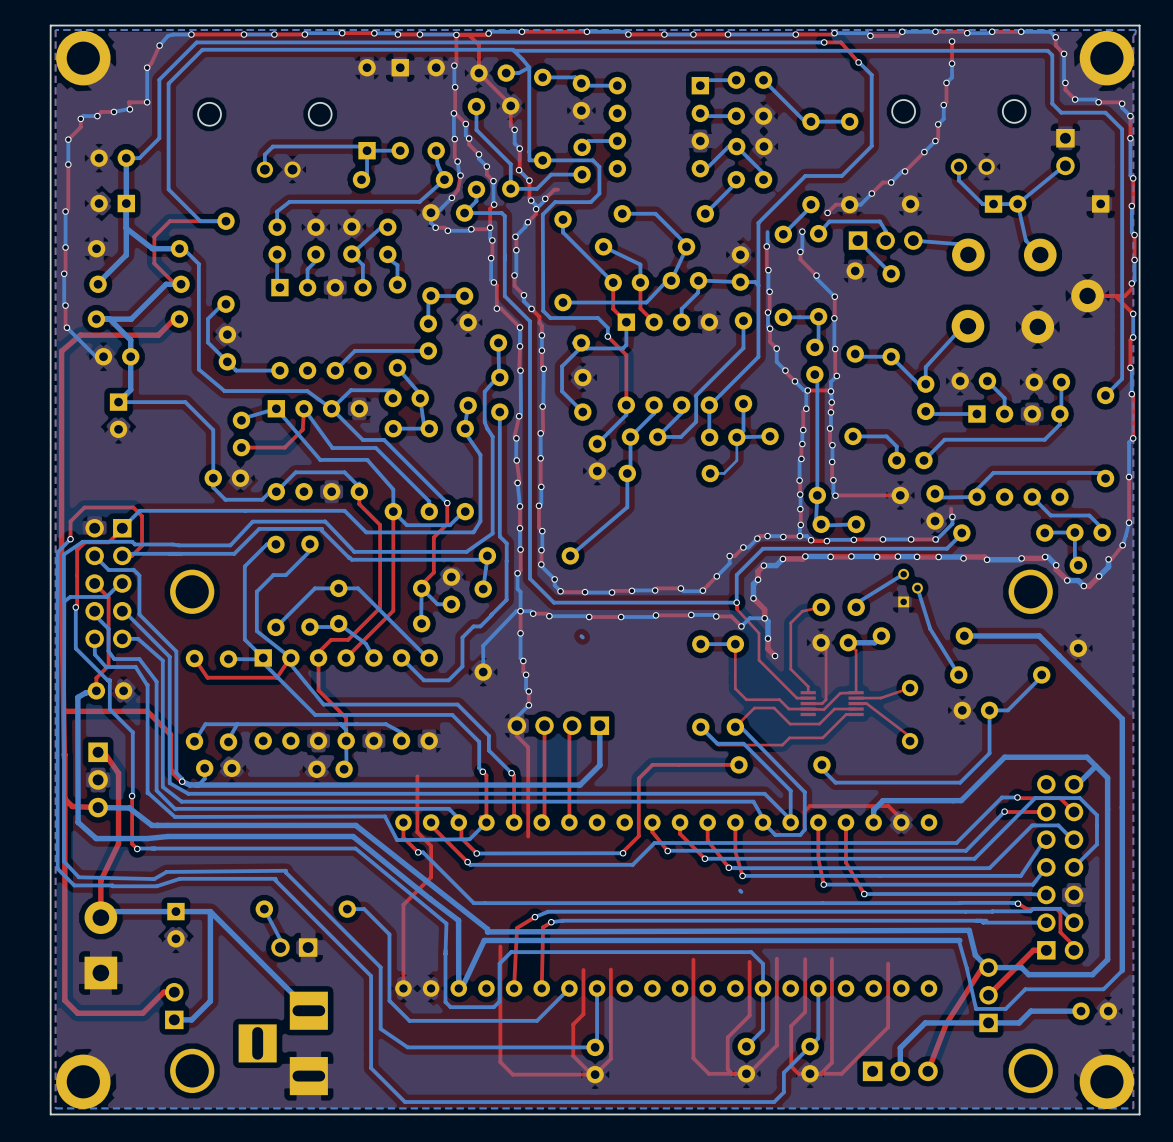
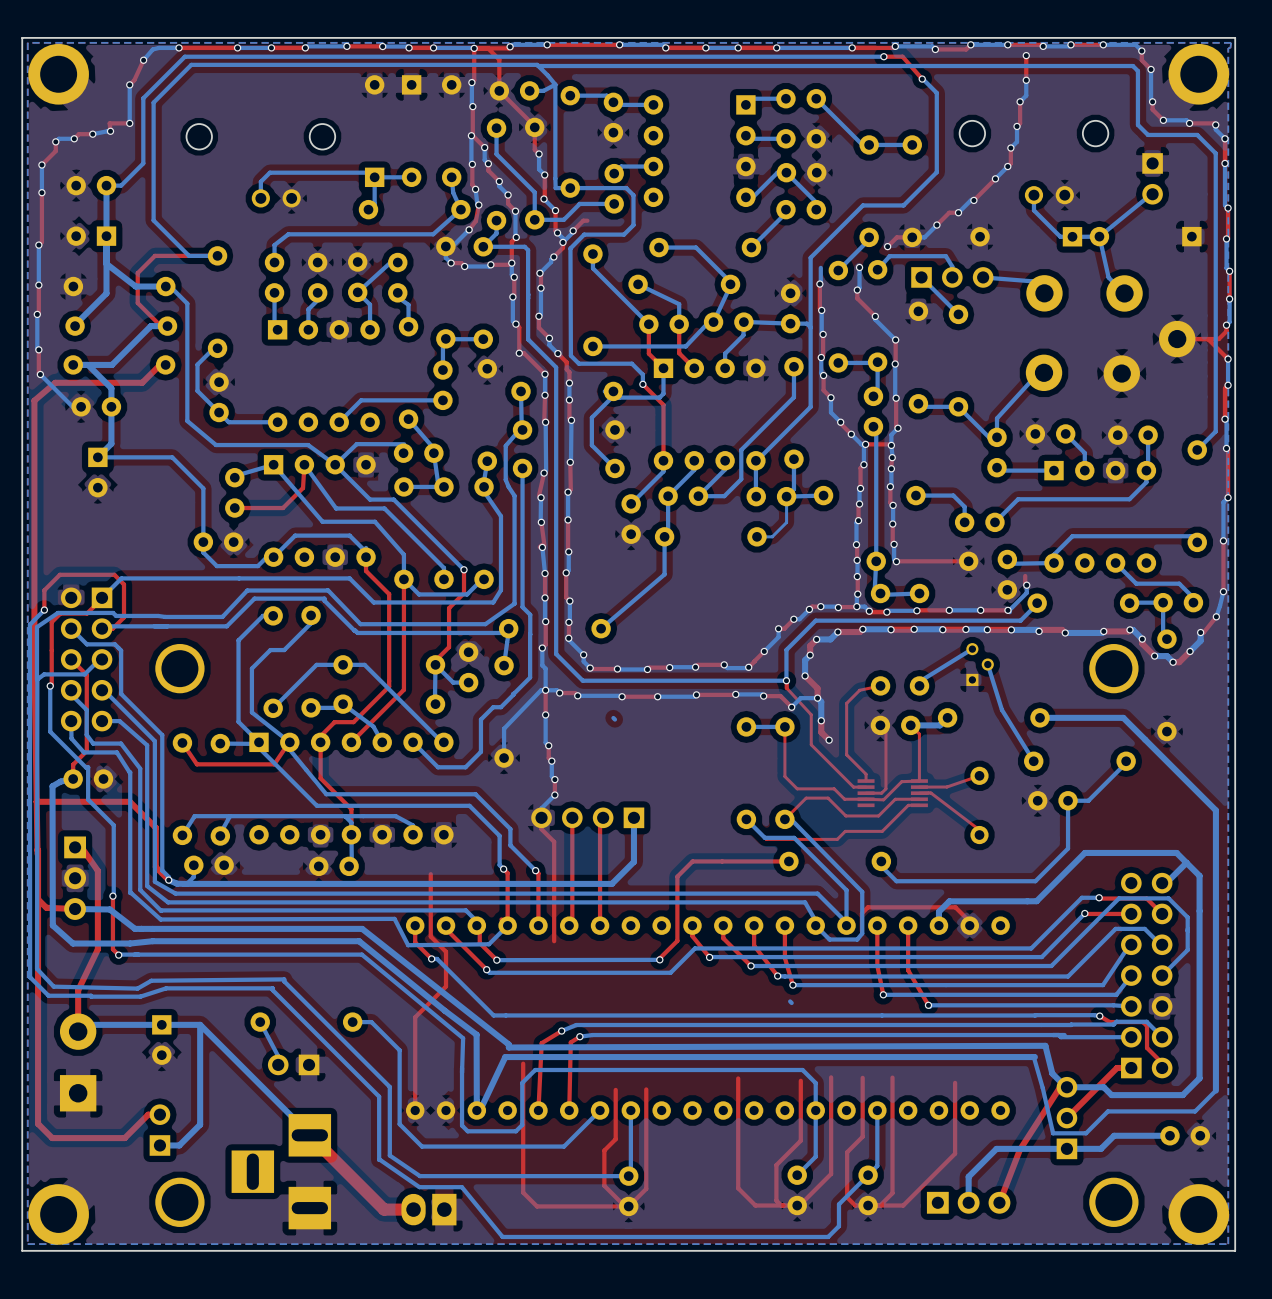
top track: none -> (309, 1135) (384, 1209) (413, 1209)
bottom track: (371, 1032) (371, 1068) (404, 1102) (481, 1102) -> (379, 1159) (419, 1187) (461, 1187) (502, 1236)
part: none -> (428, 1209)

